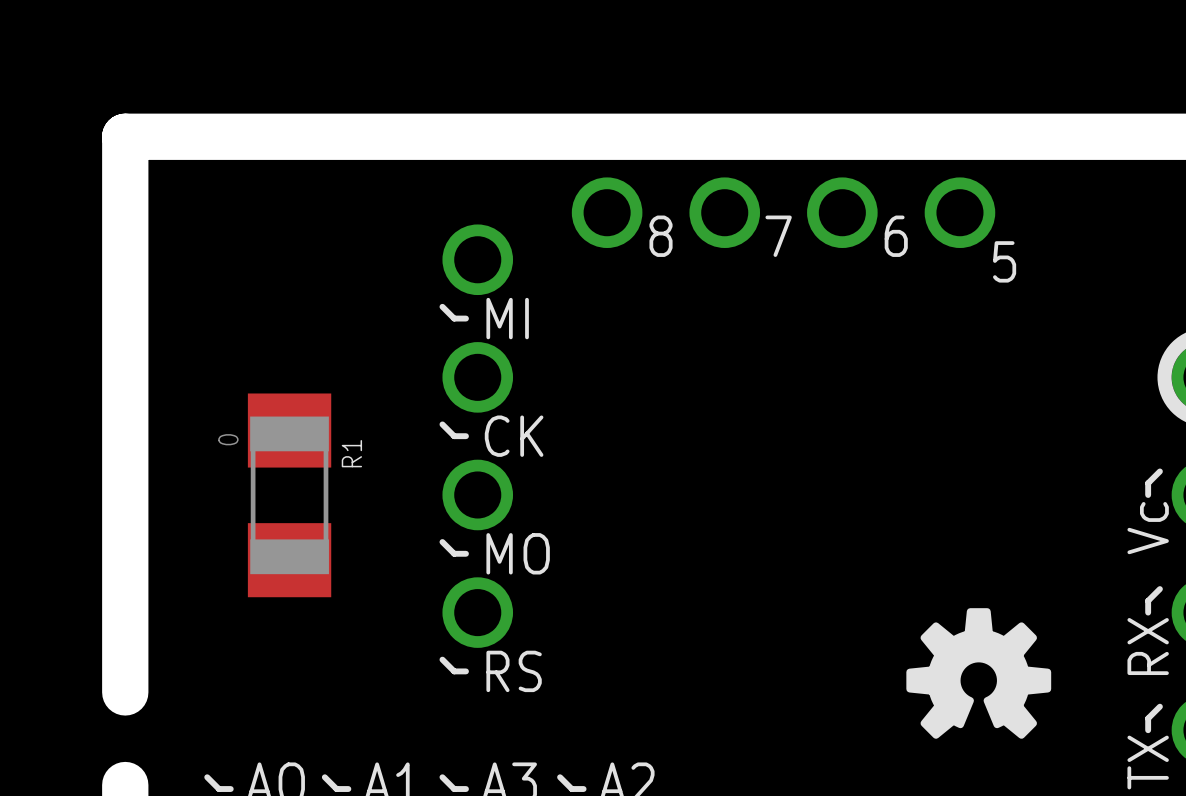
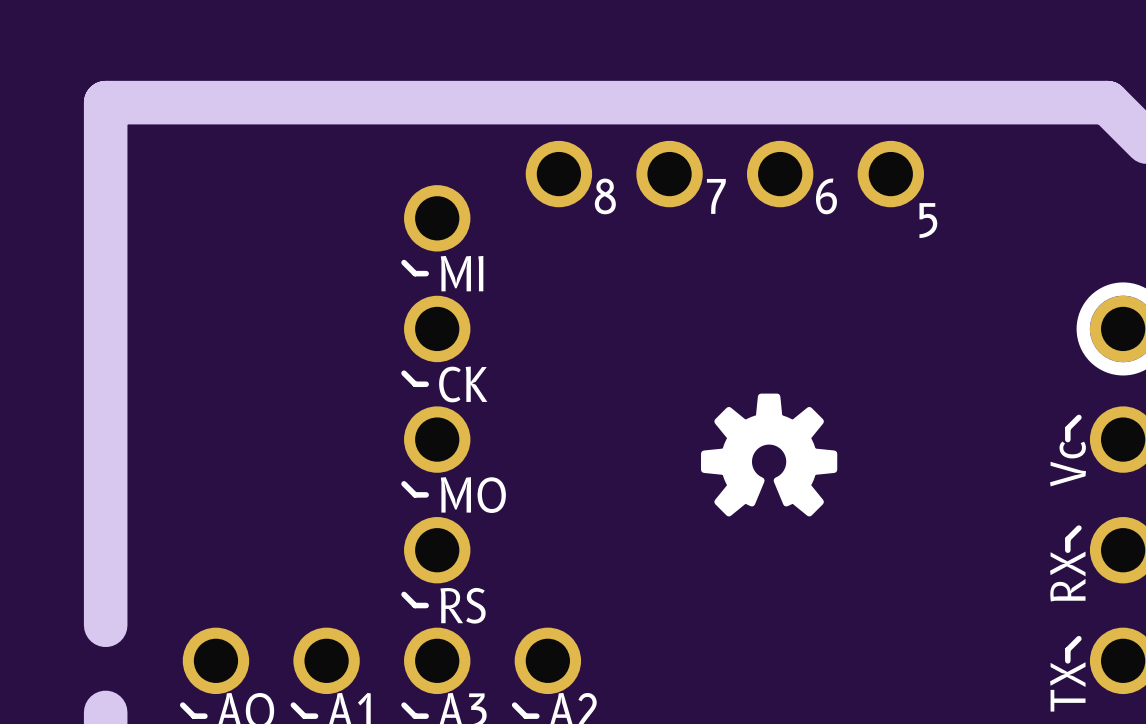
R1: 0 (289, 495) -> none
drawing position: (978, 673) -> (769, 455)
part: none -> (215, 660)
part: none -> (326, 660)
part: none -> (437, 660)
part: none -> (547, 660)

